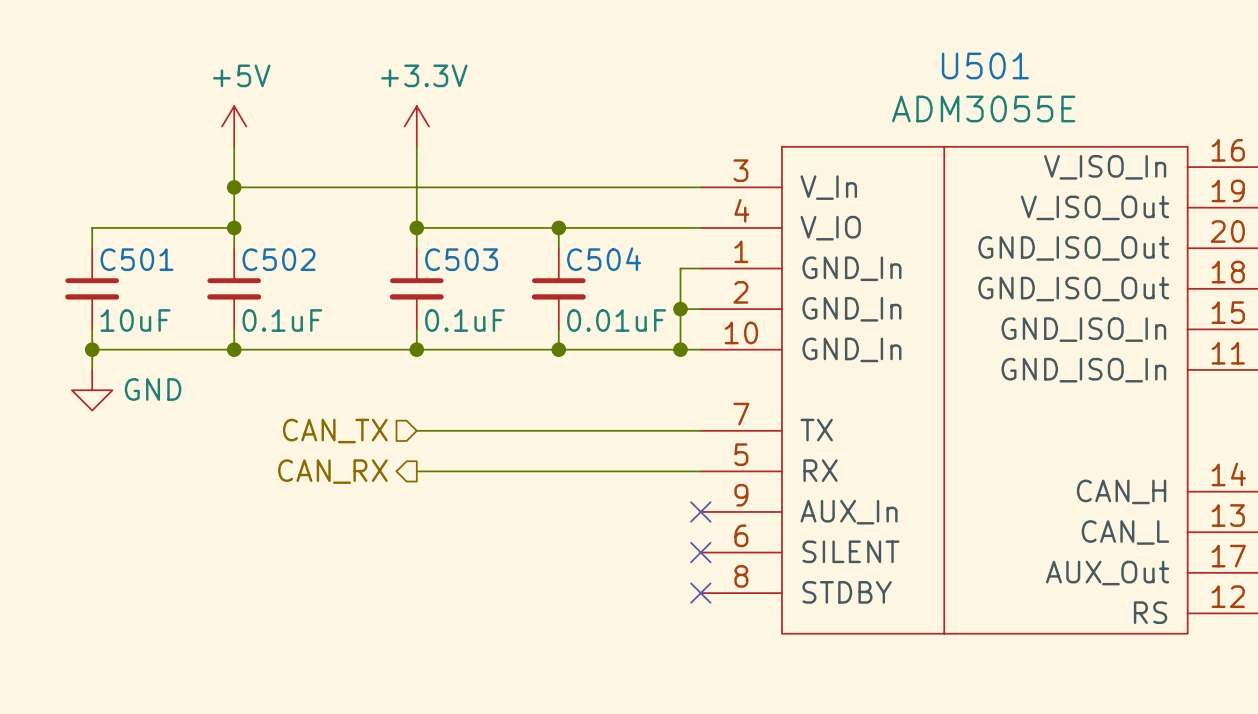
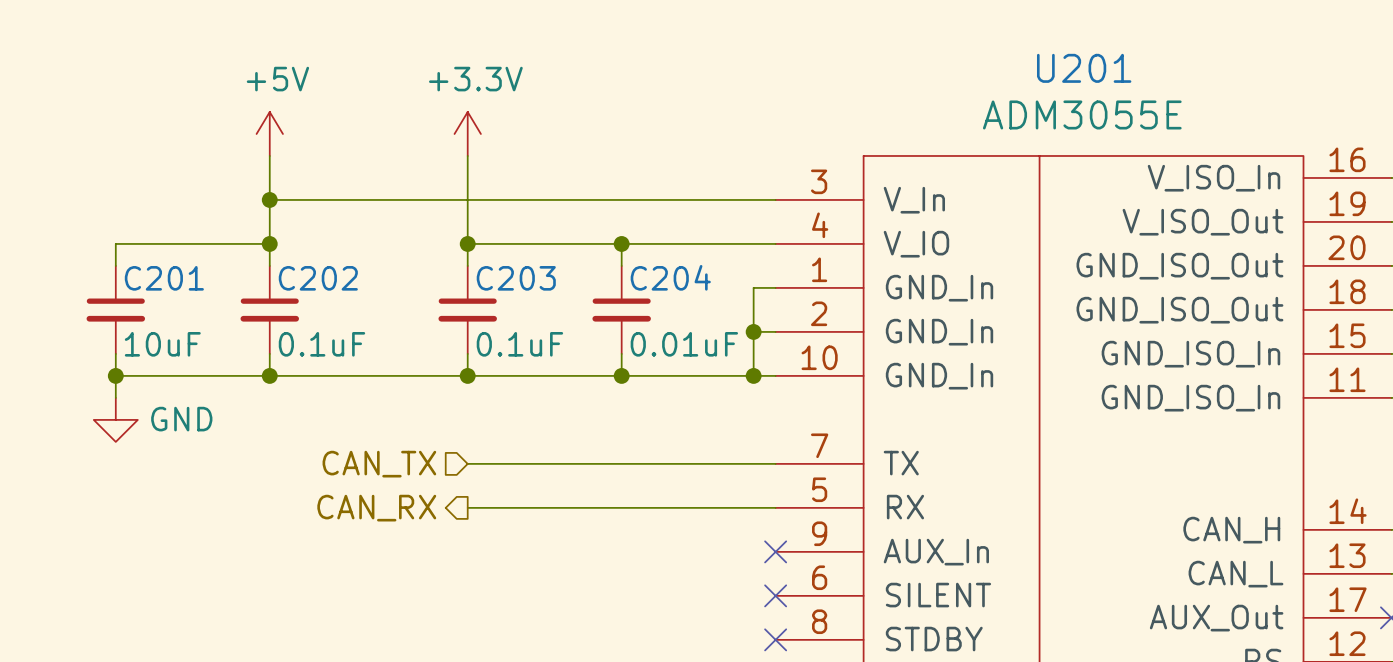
U501 name: U501 (985, 65) -> U201 (1084, 68)
C501 name: C501 (136, 259) -> C201 (164, 278)
C502 name: C502 (278, 259) -> C202 (318, 278)
C503 name: C503 (461, 259) -> C203 (516, 278)
C504 name: C504 (604, 259) -> C204 (670, 277)

